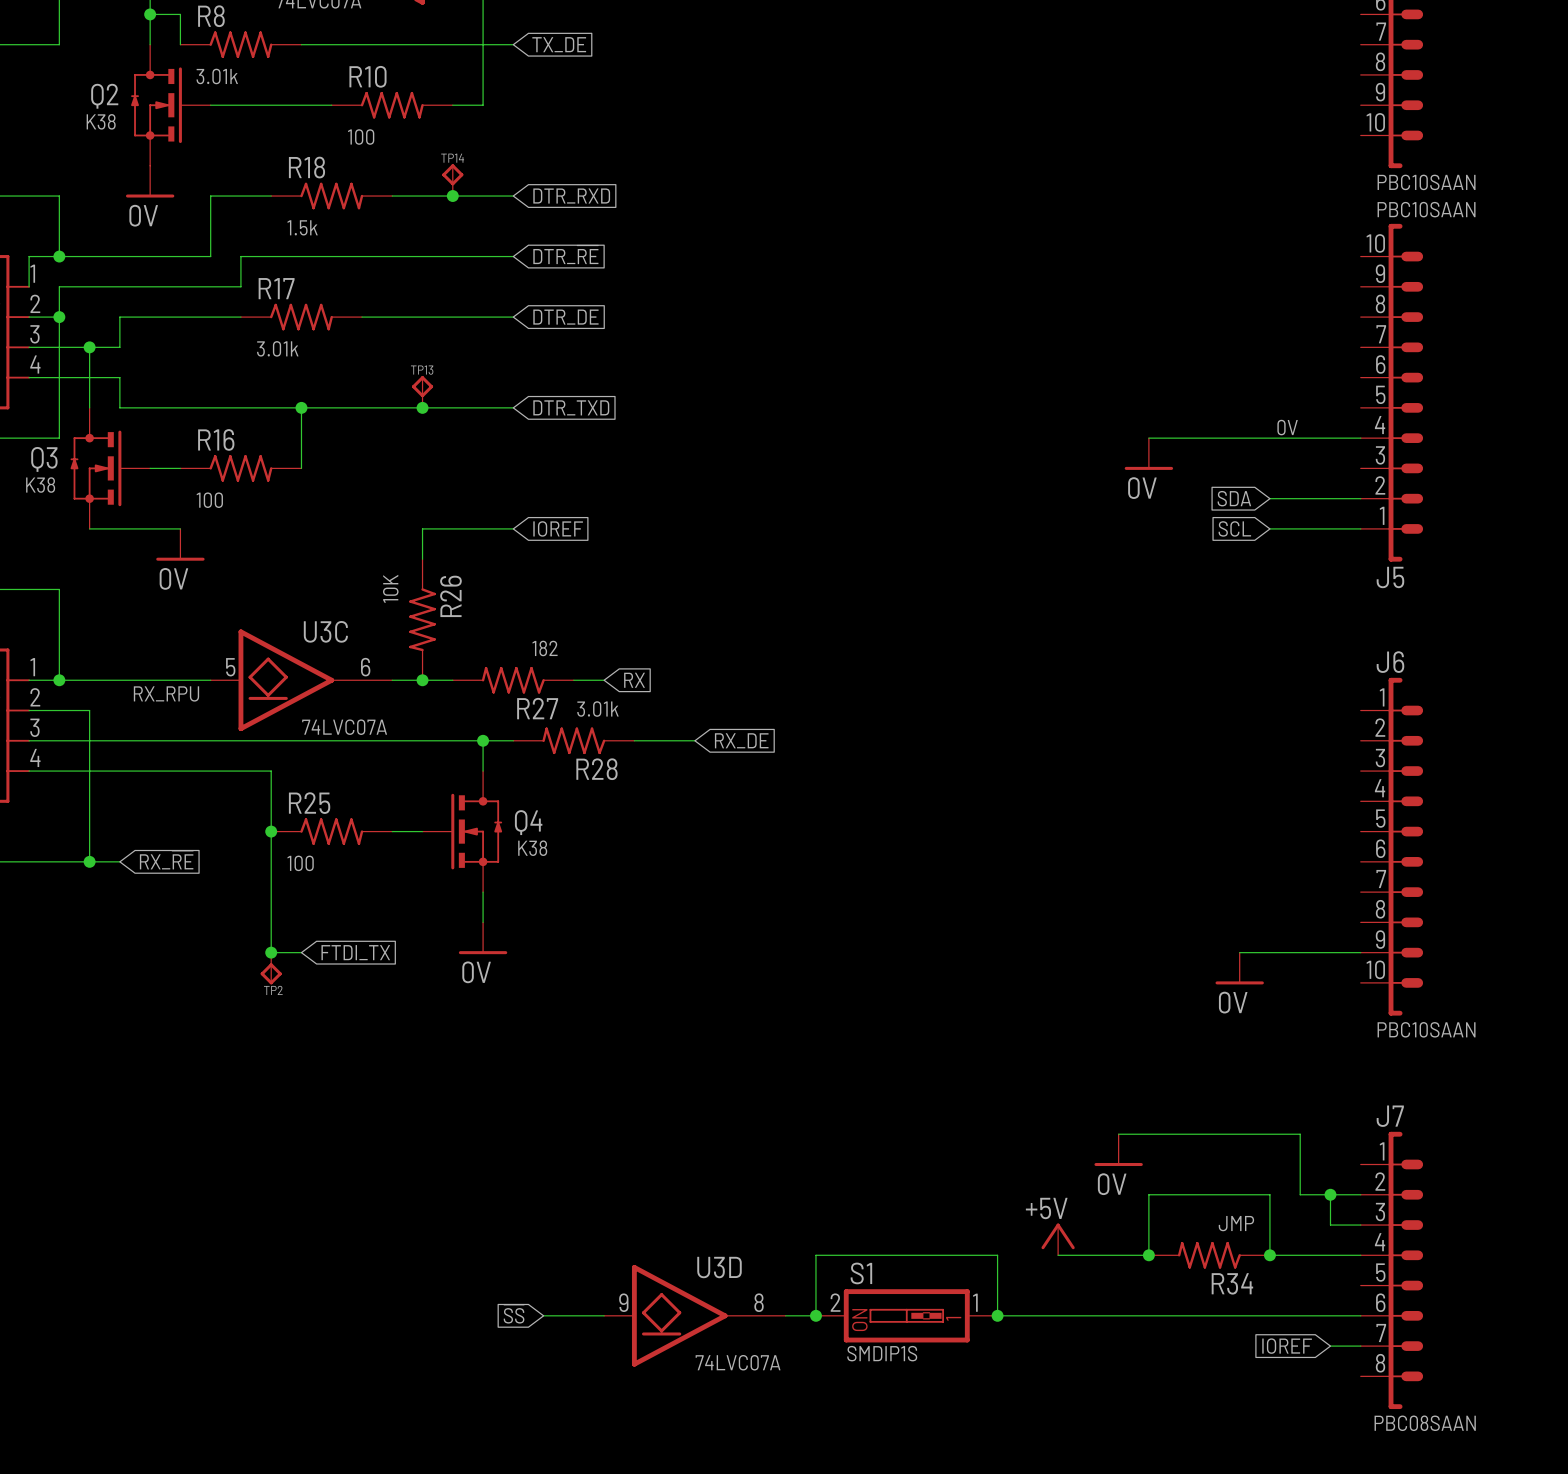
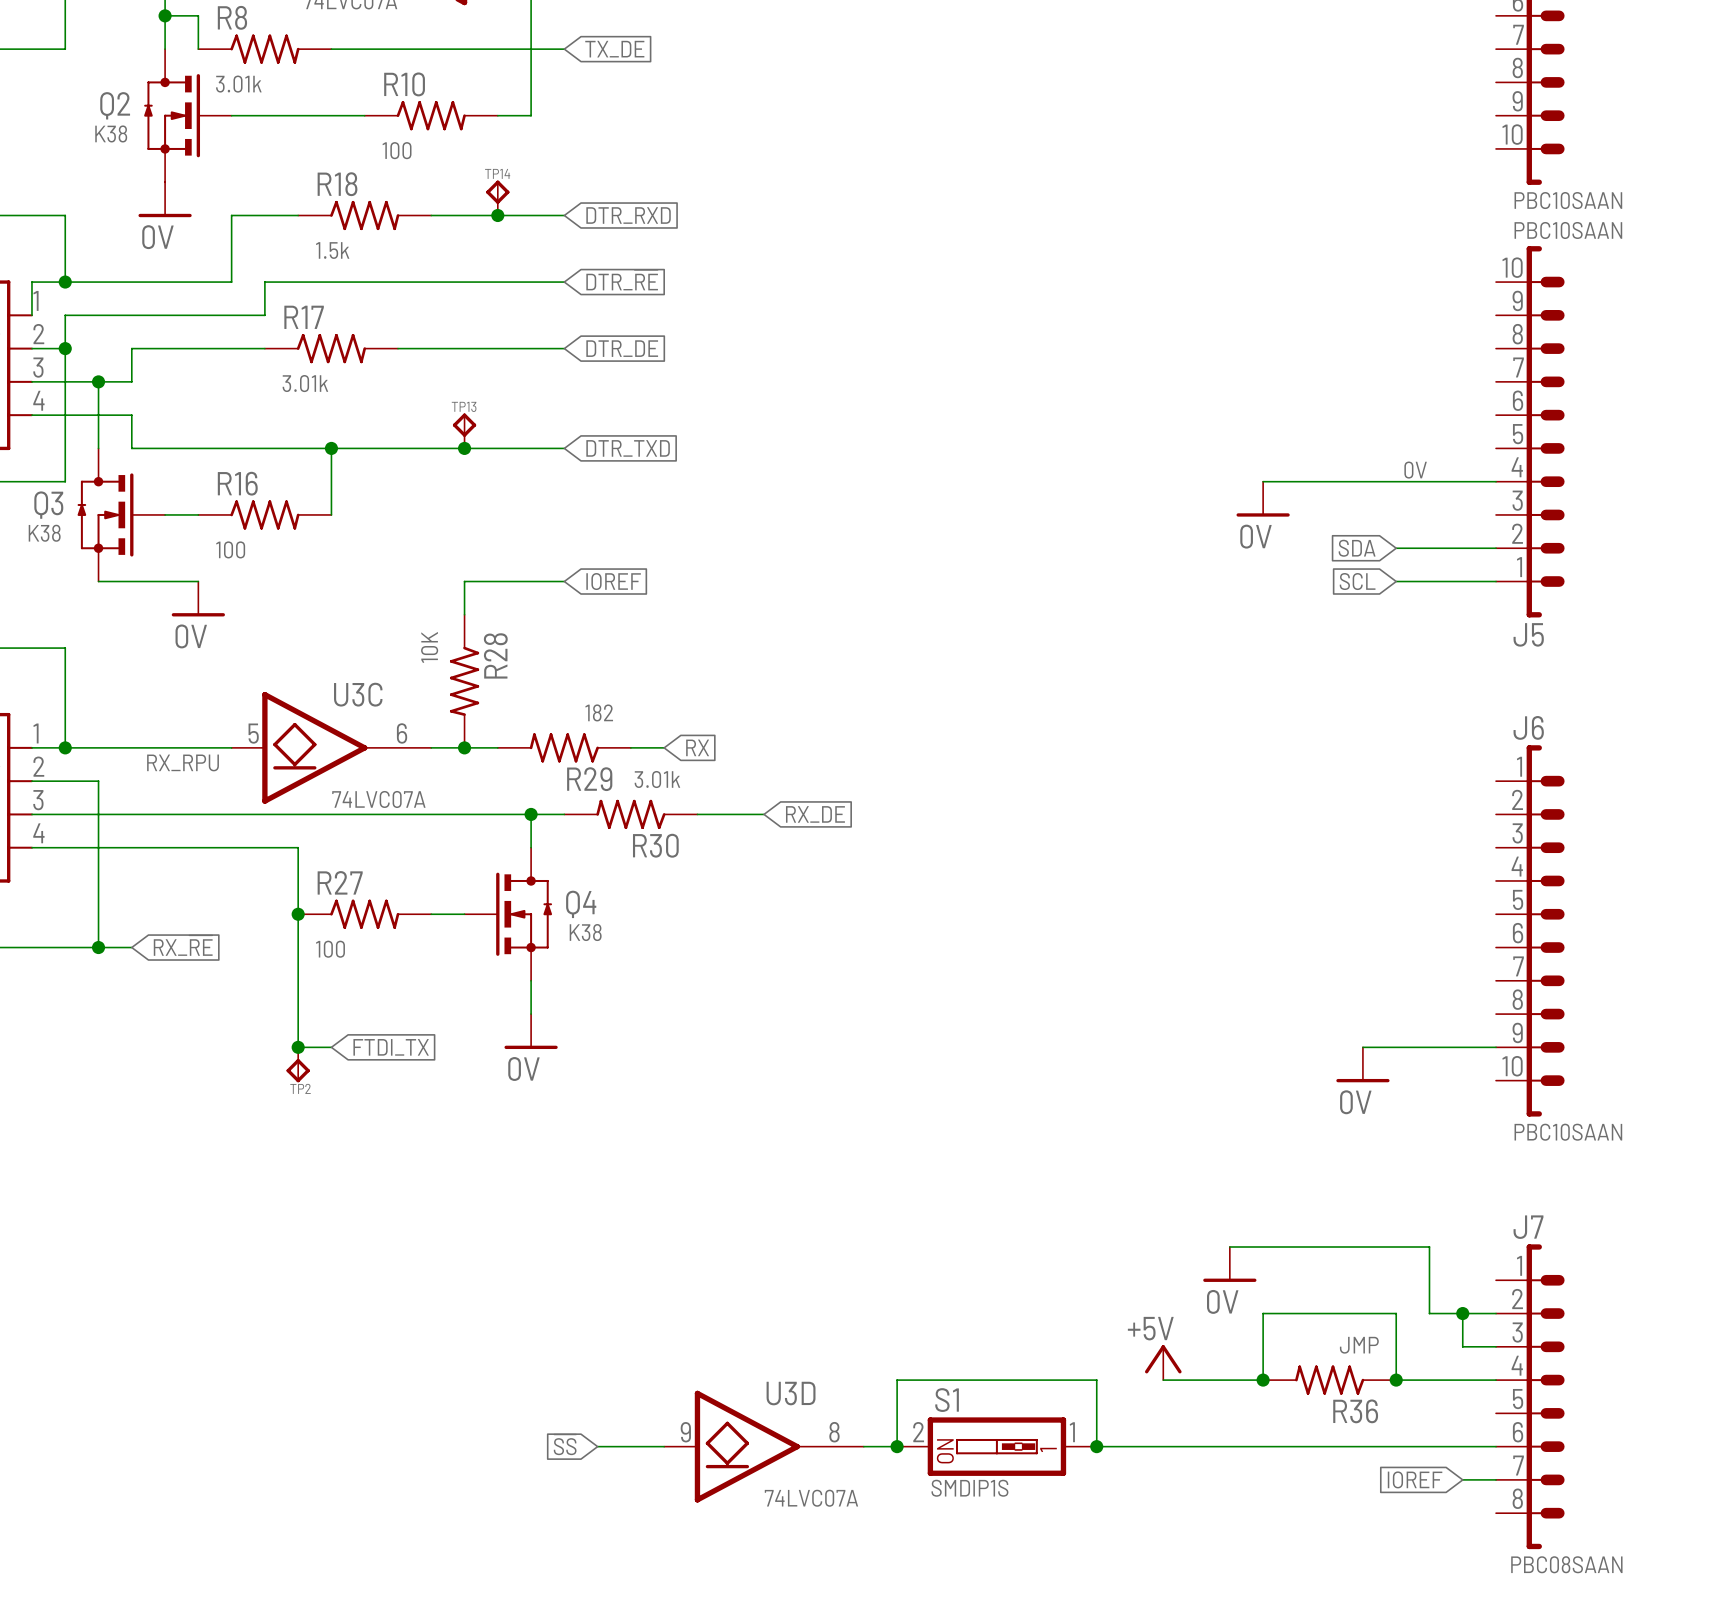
R26 name: R26 (450, 596) -> R28 (495, 655)
R27 name: R27 (537, 708) -> R29 (589, 779)
R28 name: R28 (596, 769) -> R30 (655, 845)
R25 name: R25 (309, 803) -> R27 (340, 882)
R34 name: R34 (1232, 1283) -> R36 (1355, 1411)

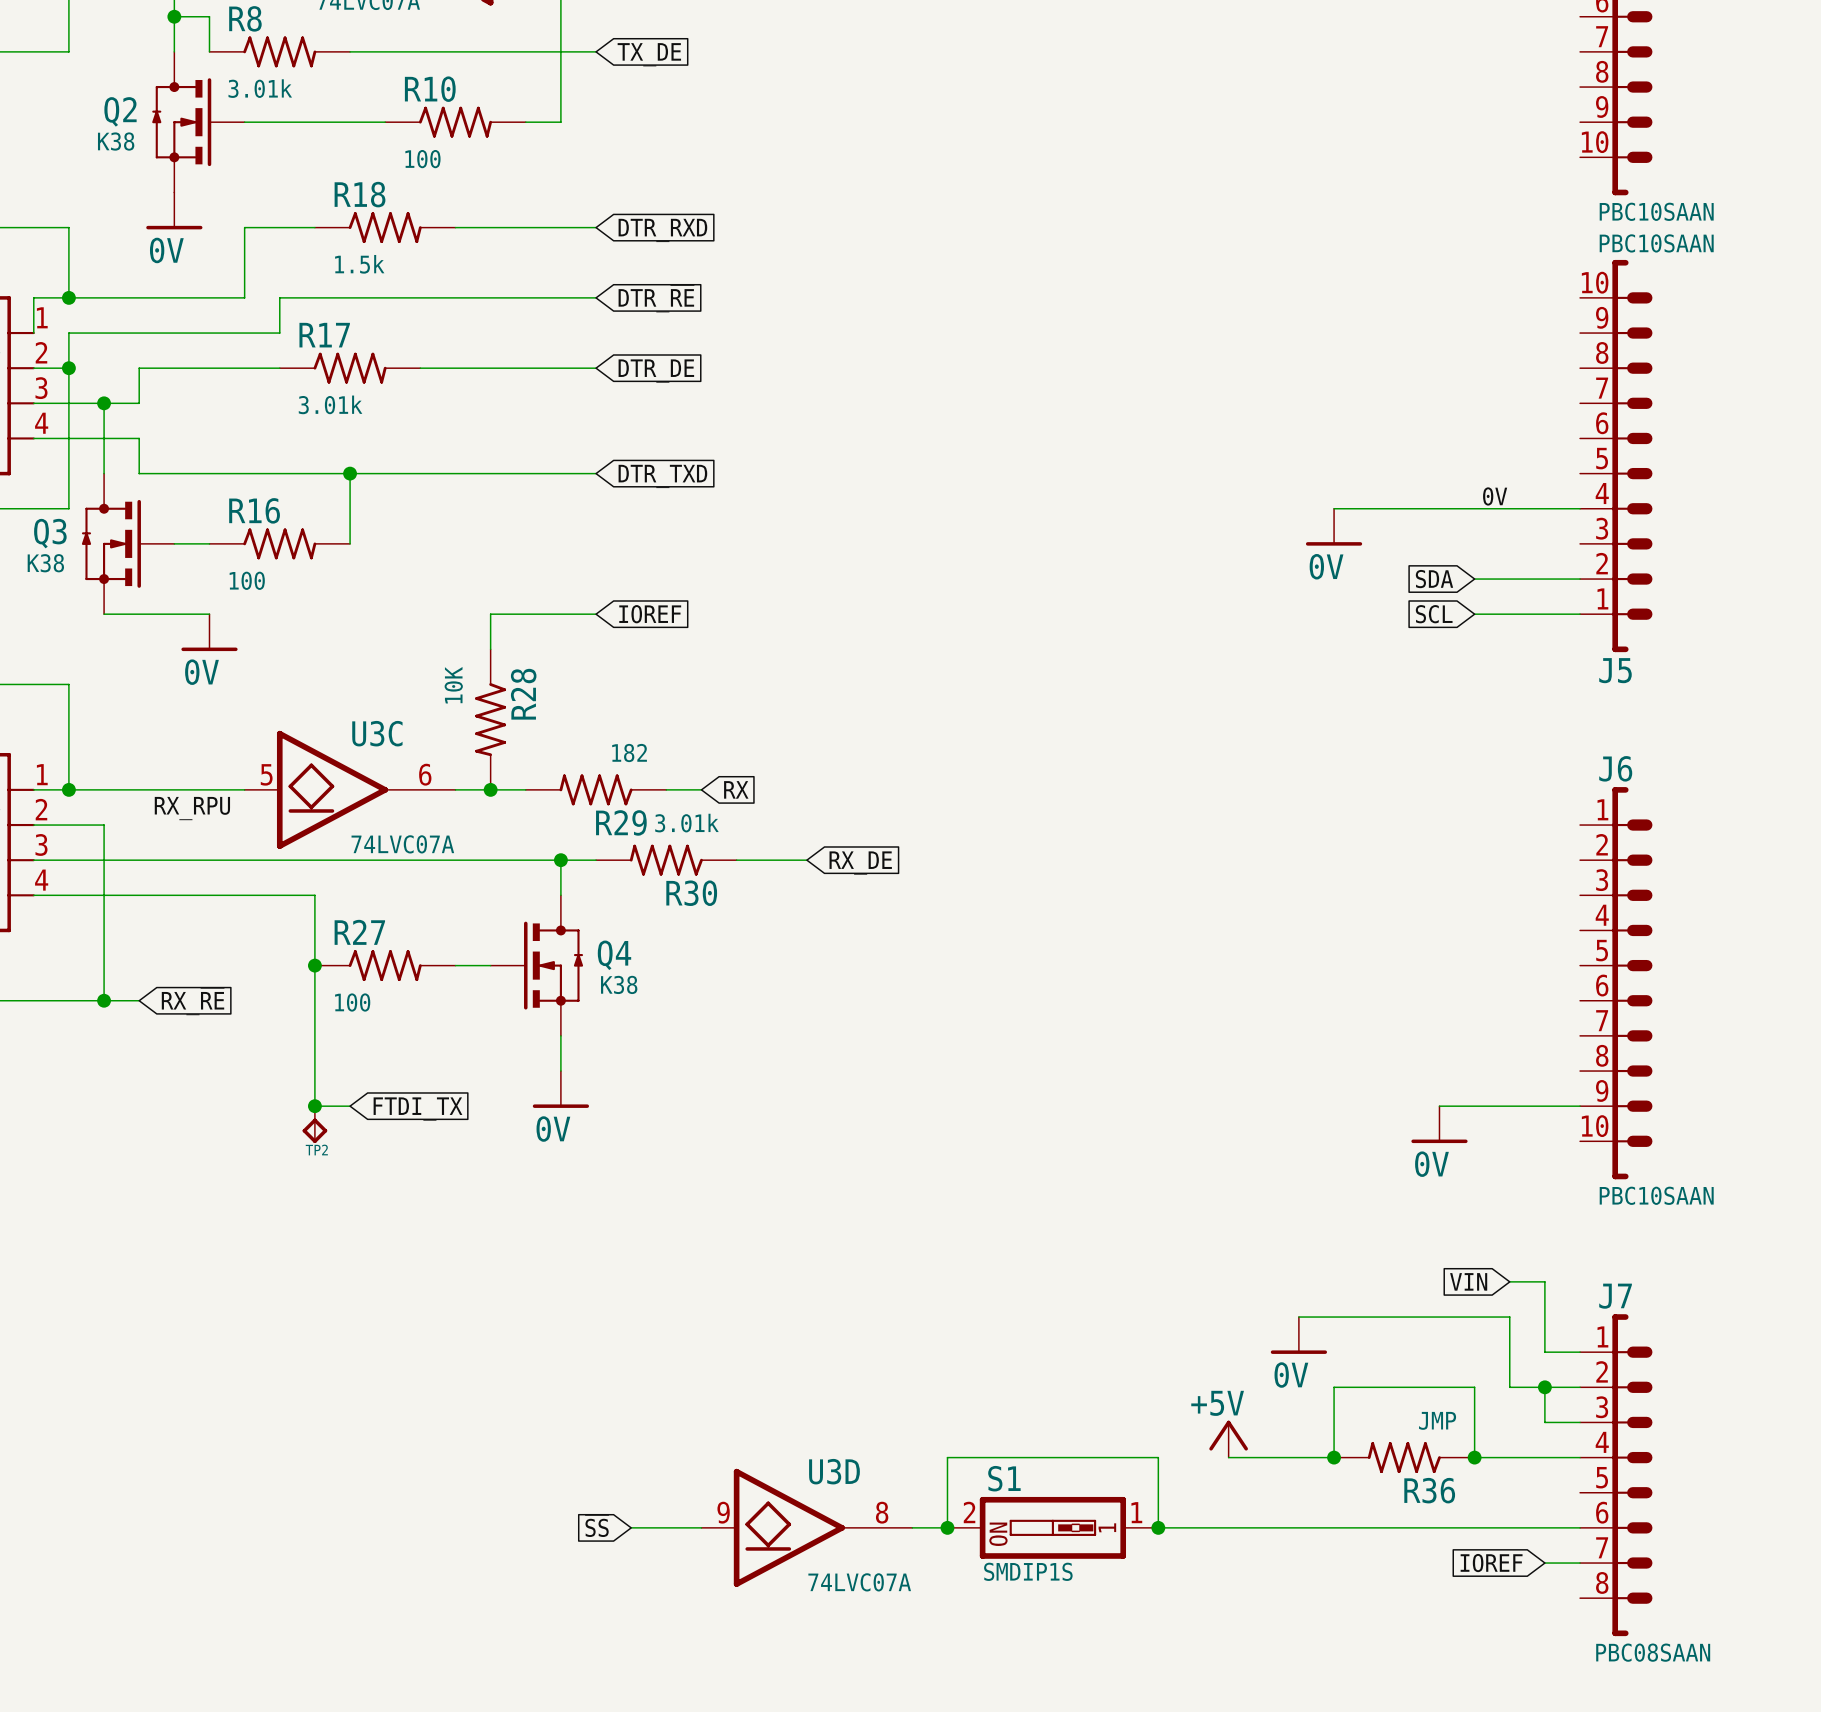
TP14: (497, 198) -> none
junction: (497, 215) -> none
TP13: (464, 430) -> none
junction: (464, 448) -> none
global label: none -> VIN (1468, 1281)
wire: none -> (1509, 1281) (1544, 1281) (1544, 1352) (1580, 1352)

